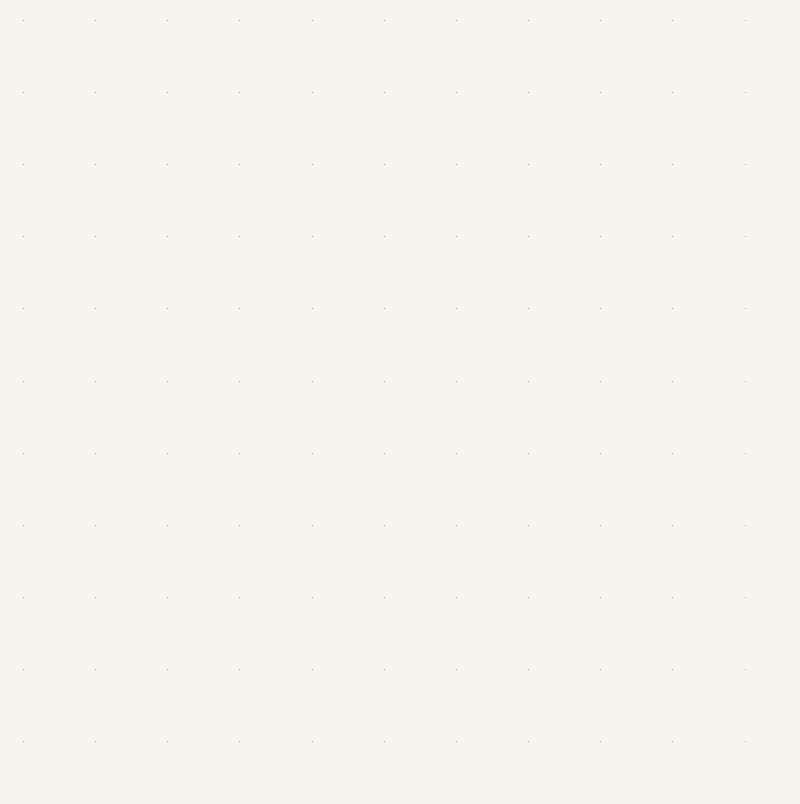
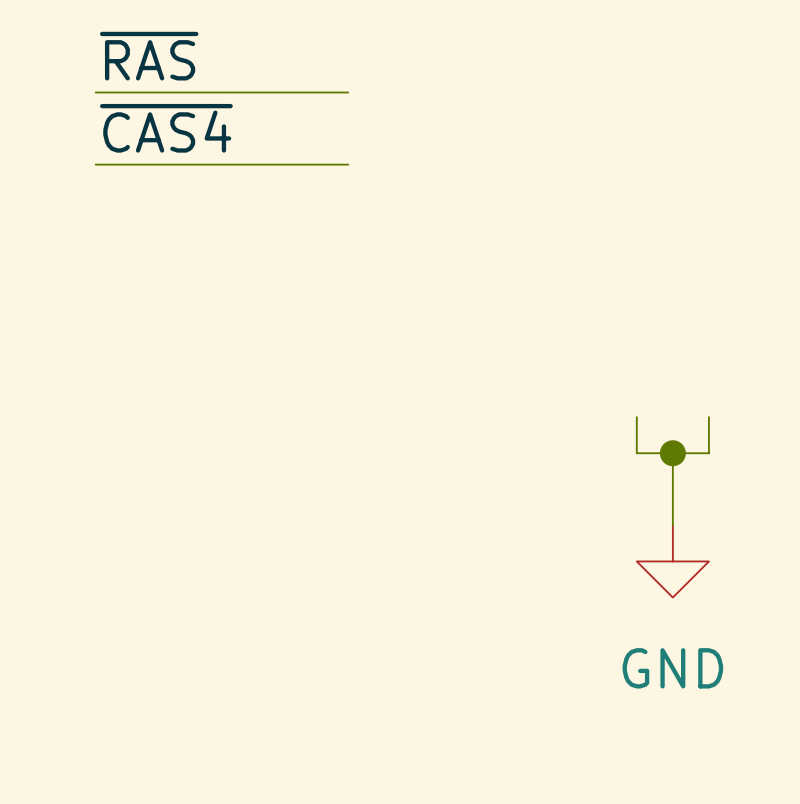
label: none -> ~{RAS} (149, 56)
wire: none -> (95, 92) (348, 92)
label: none -> ~{CAS4} (166, 128)
wire: none -> (95, 164) (348, 164)
wire: none -> (636, 417) (636, 453) (708, 453) (708, 417)
wire: none -> (672, 453) (672, 525)
junction: none -> (672, 453)
power symbol: none -> GND (672, 561)

